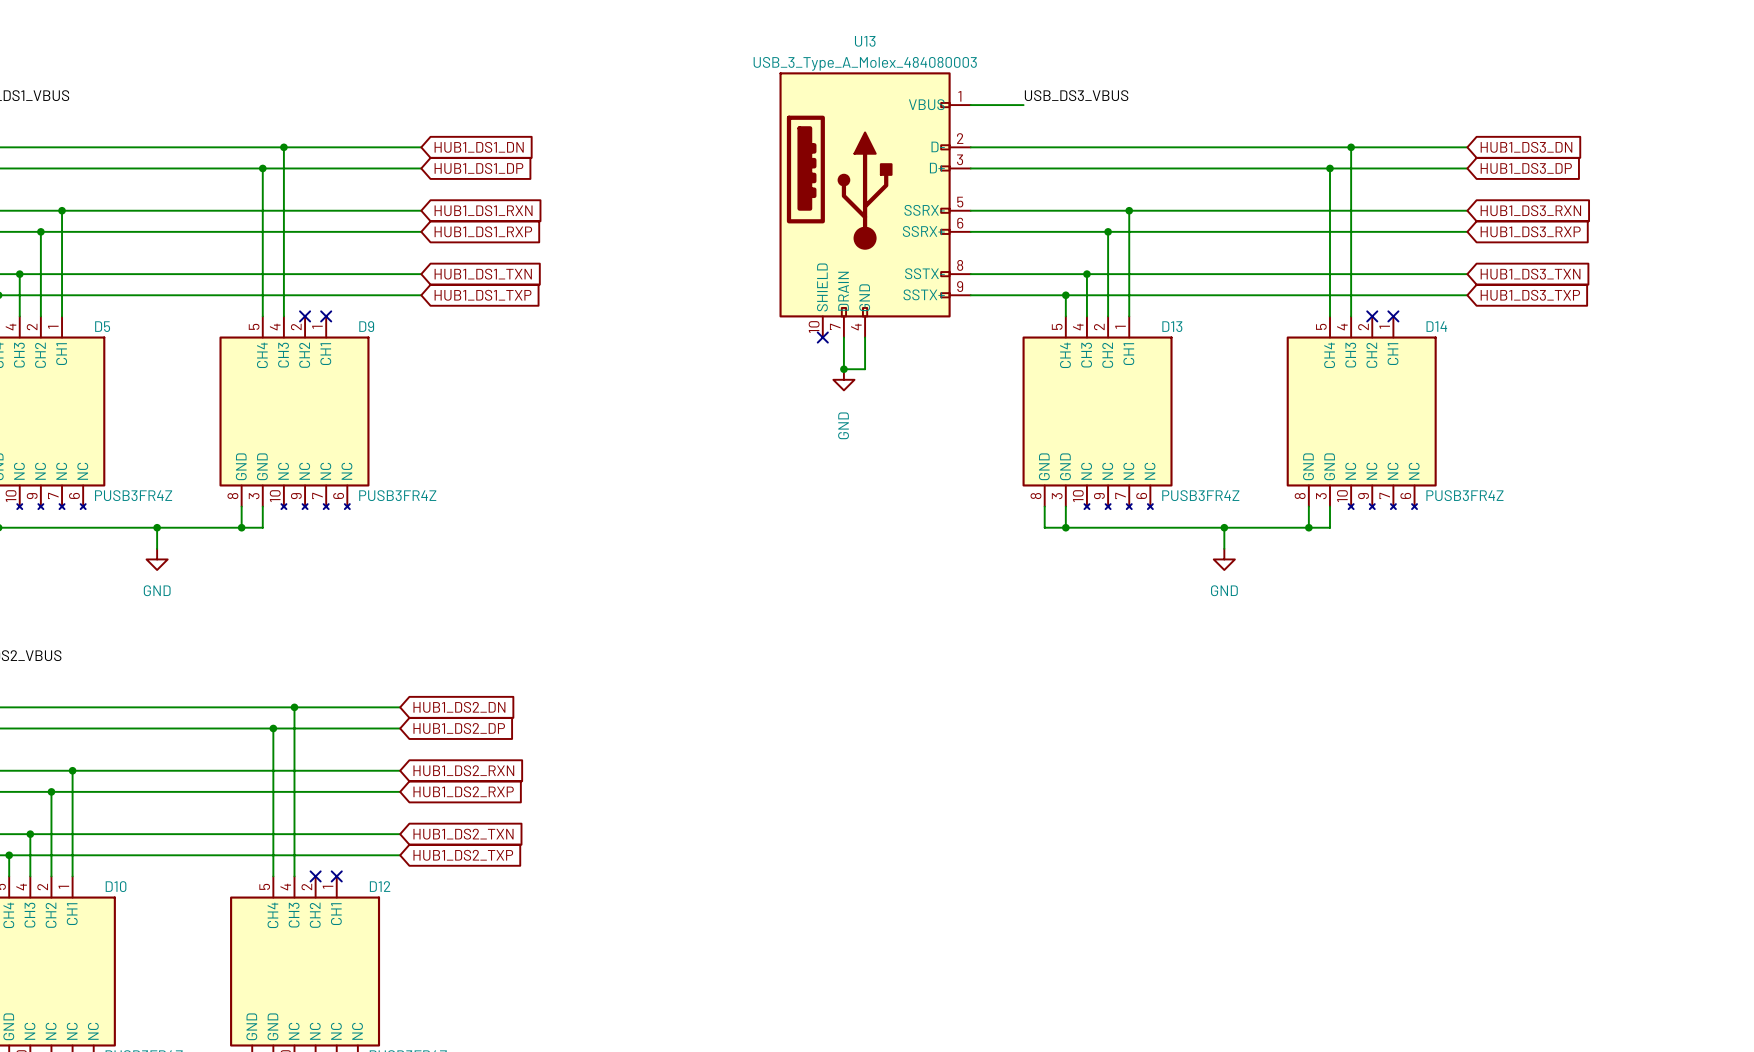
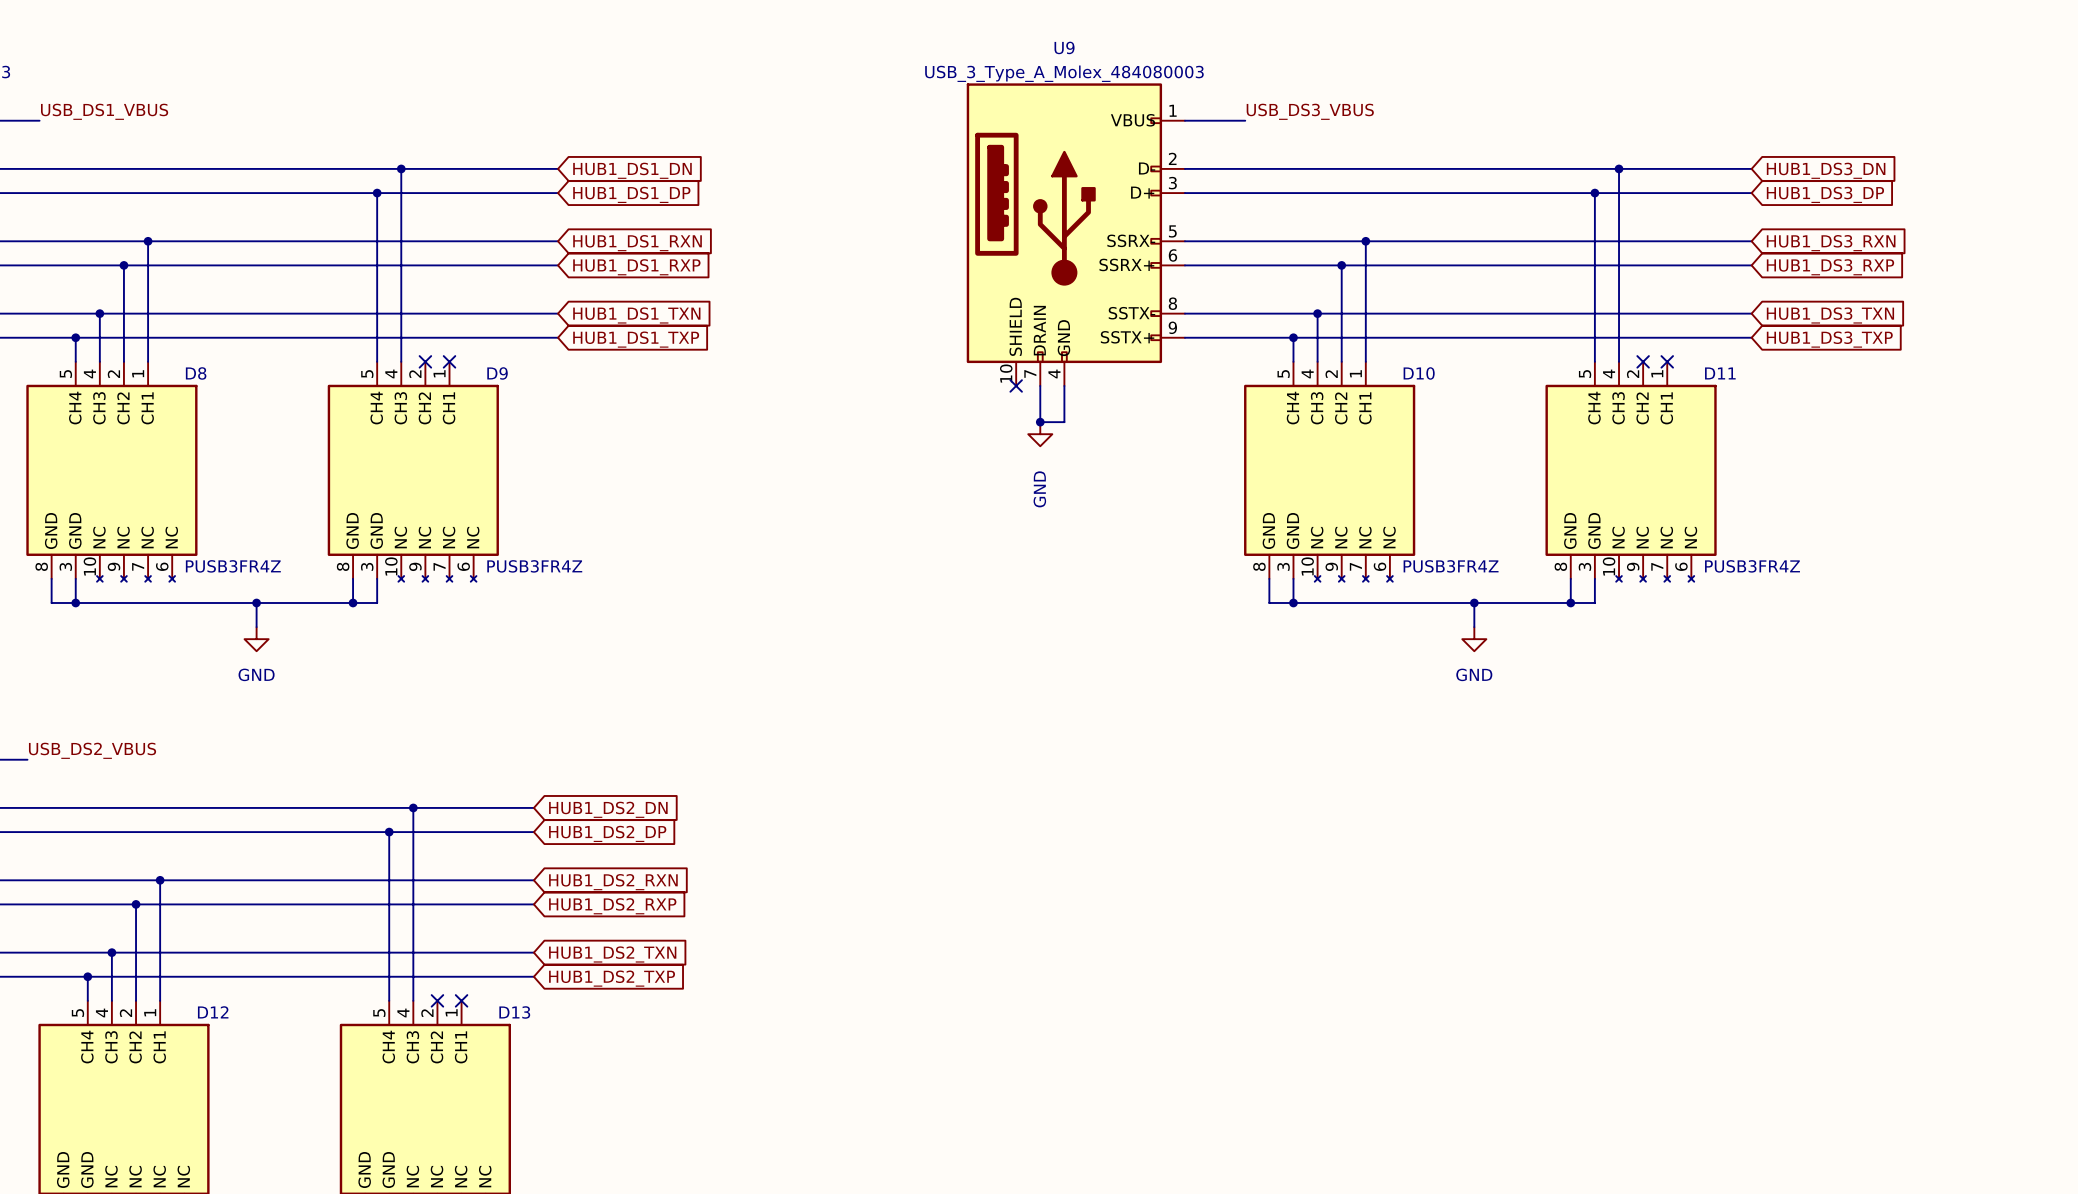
U13 name: U13 (865, 41) -> U9 (1064, 47)
D5 name: D5 (102, 326) -> D8 (196, 373)
D13 name: D13 (1172, 326) -> D10 (1419, 373)
D14 name: D14 (1436, 326) -> D11 (1720, 373)
D10 name: D10 (116, 886) -> D12 (213, 1012)
D12 name: D12 (380, 886) -> D13 (514, 1012)

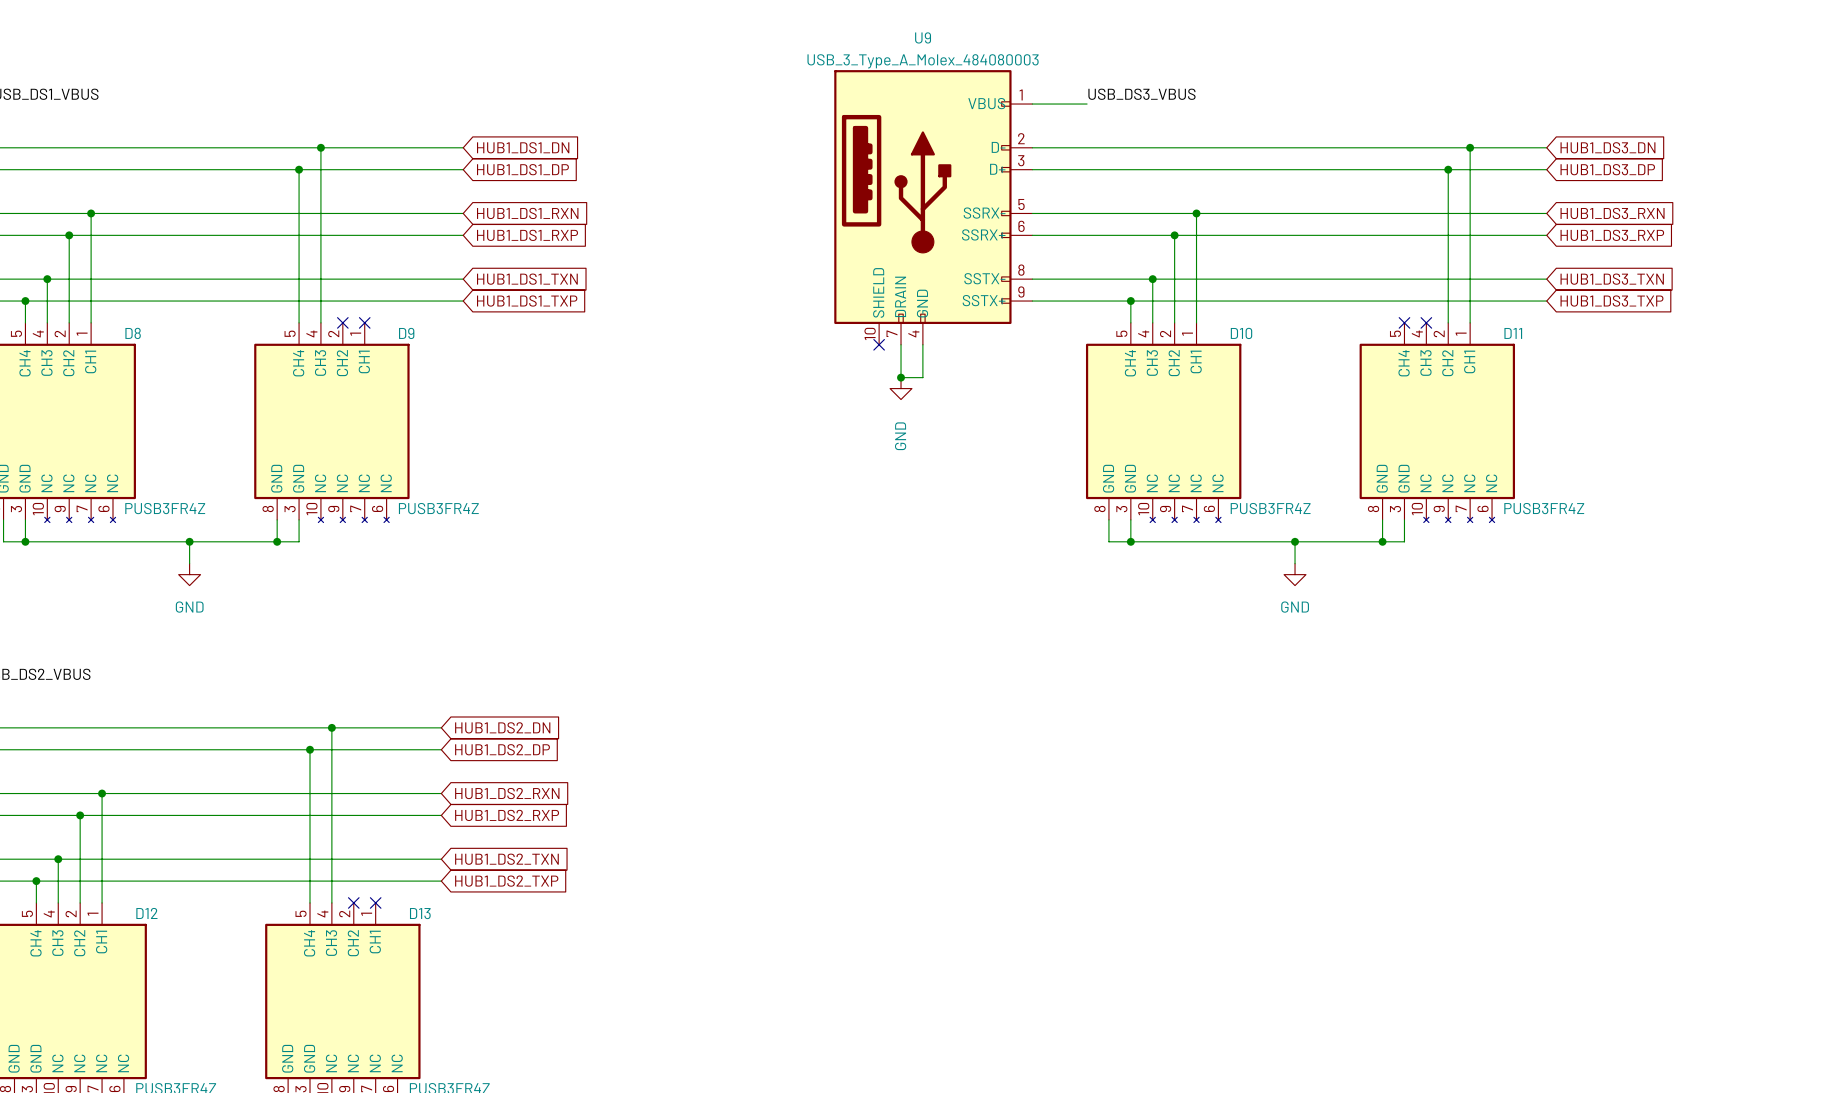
wire: (1619, 168) (1619, 361) -> (1470, 147) (1470, 322)
junction: (1619, 168) -> none
junction: none -> (1470, 147)
wire: (1594, 193) (1594, 361) -> (1448, 169) (1448, 322)
junction: (1594, 193) -> none
junction: none -> (1448, 169)
no-connect mark: none -> (1404, 322)
no-connect mark: none -> (1426, 322)
no-connect mark: (1643, 361) -> none
no-connect mark: (1667, 361) -> none

